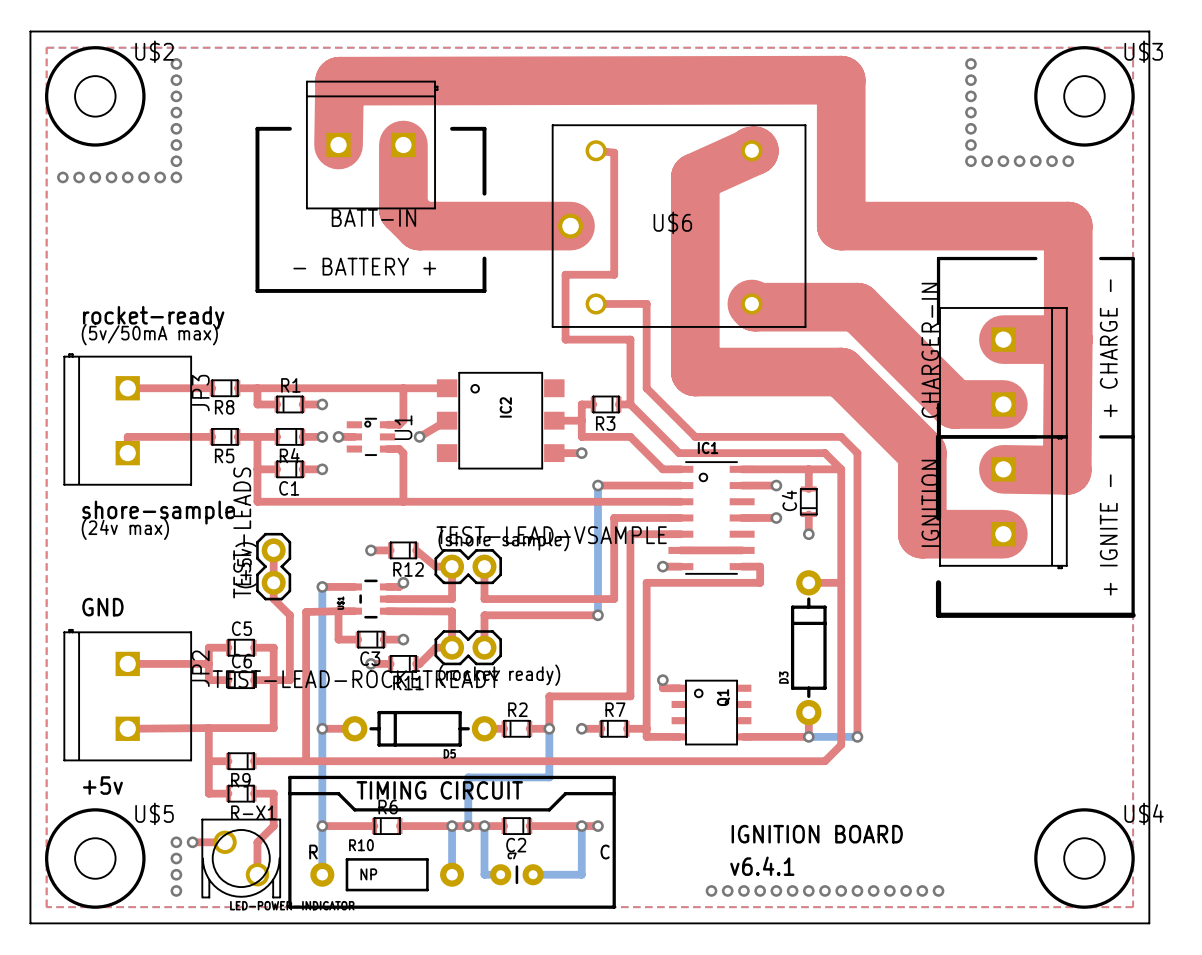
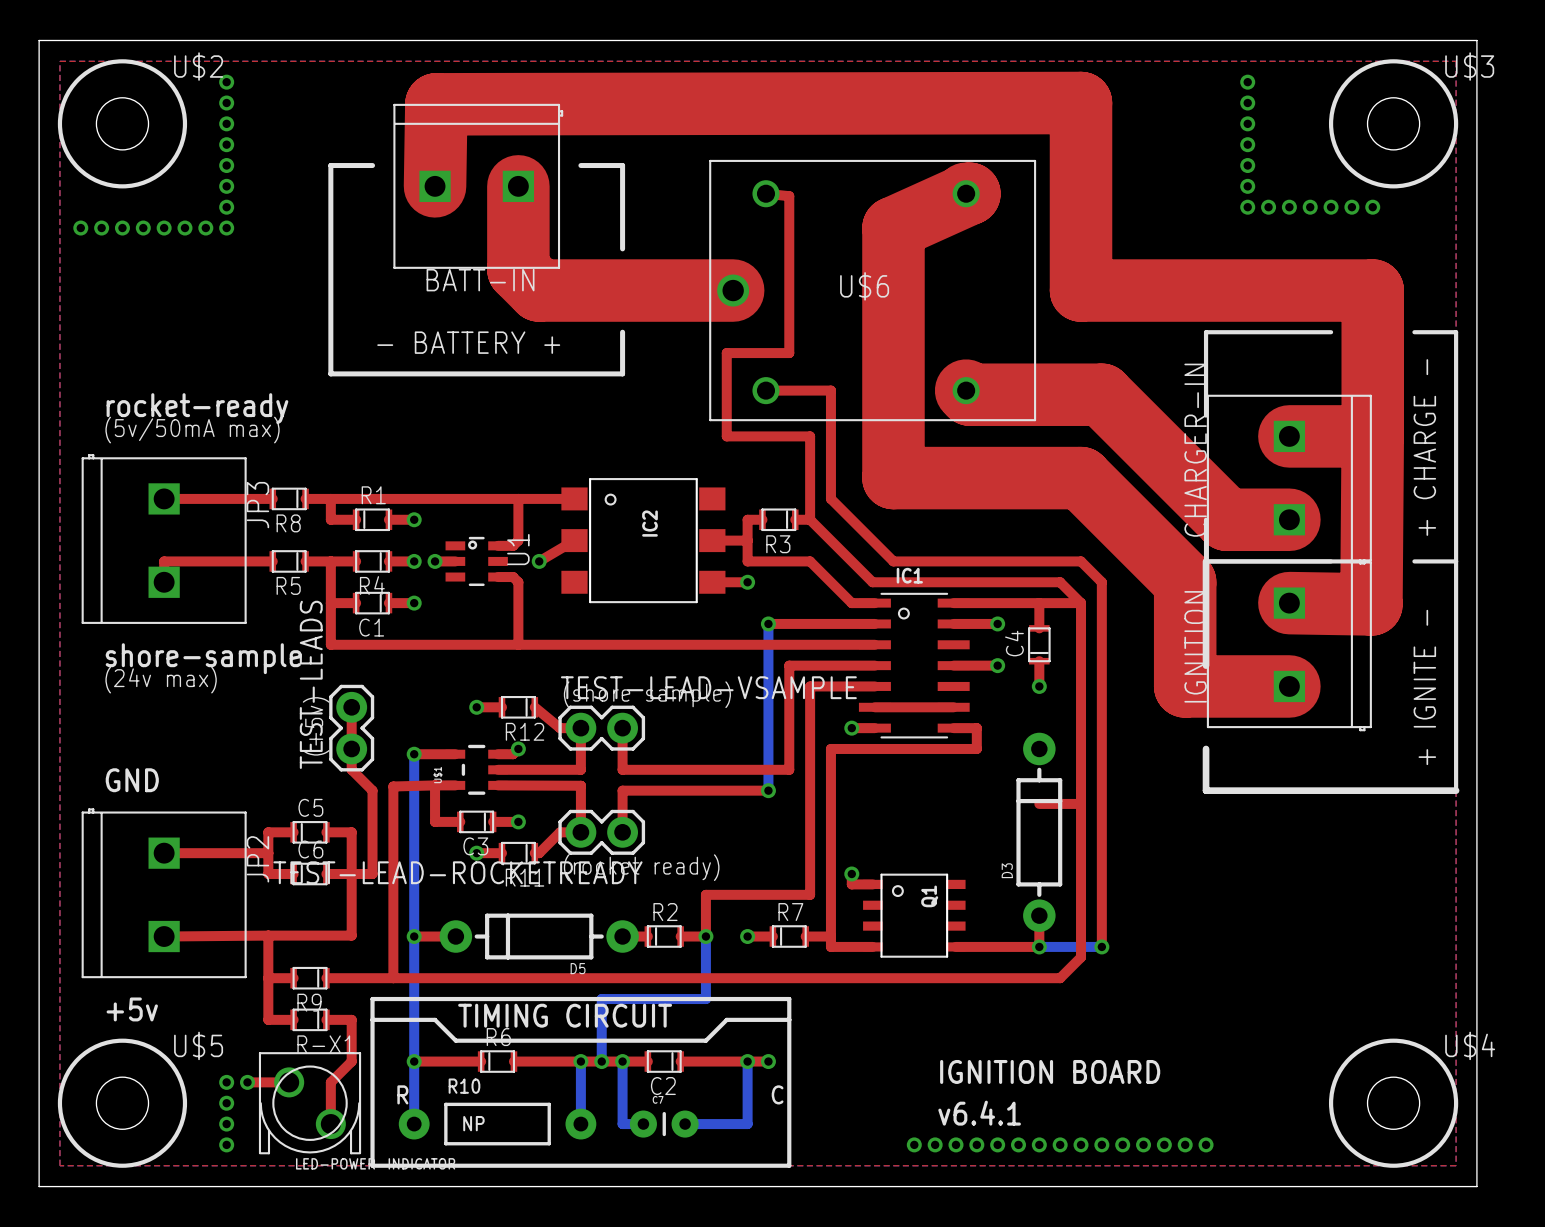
top track: (808, 582) (841, 582) -> none
top track: none -> (1081, 790) (1081, 803) (1039, 803)

